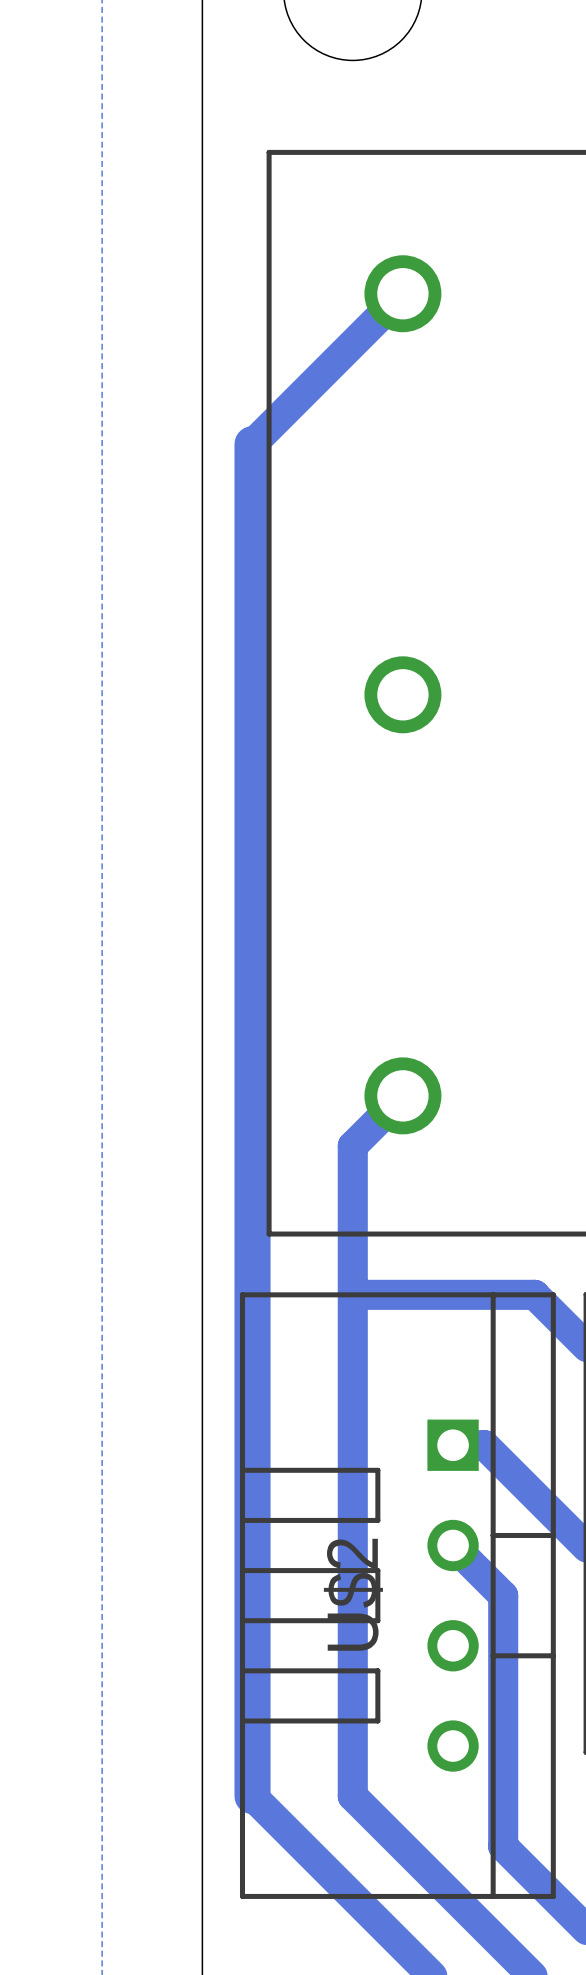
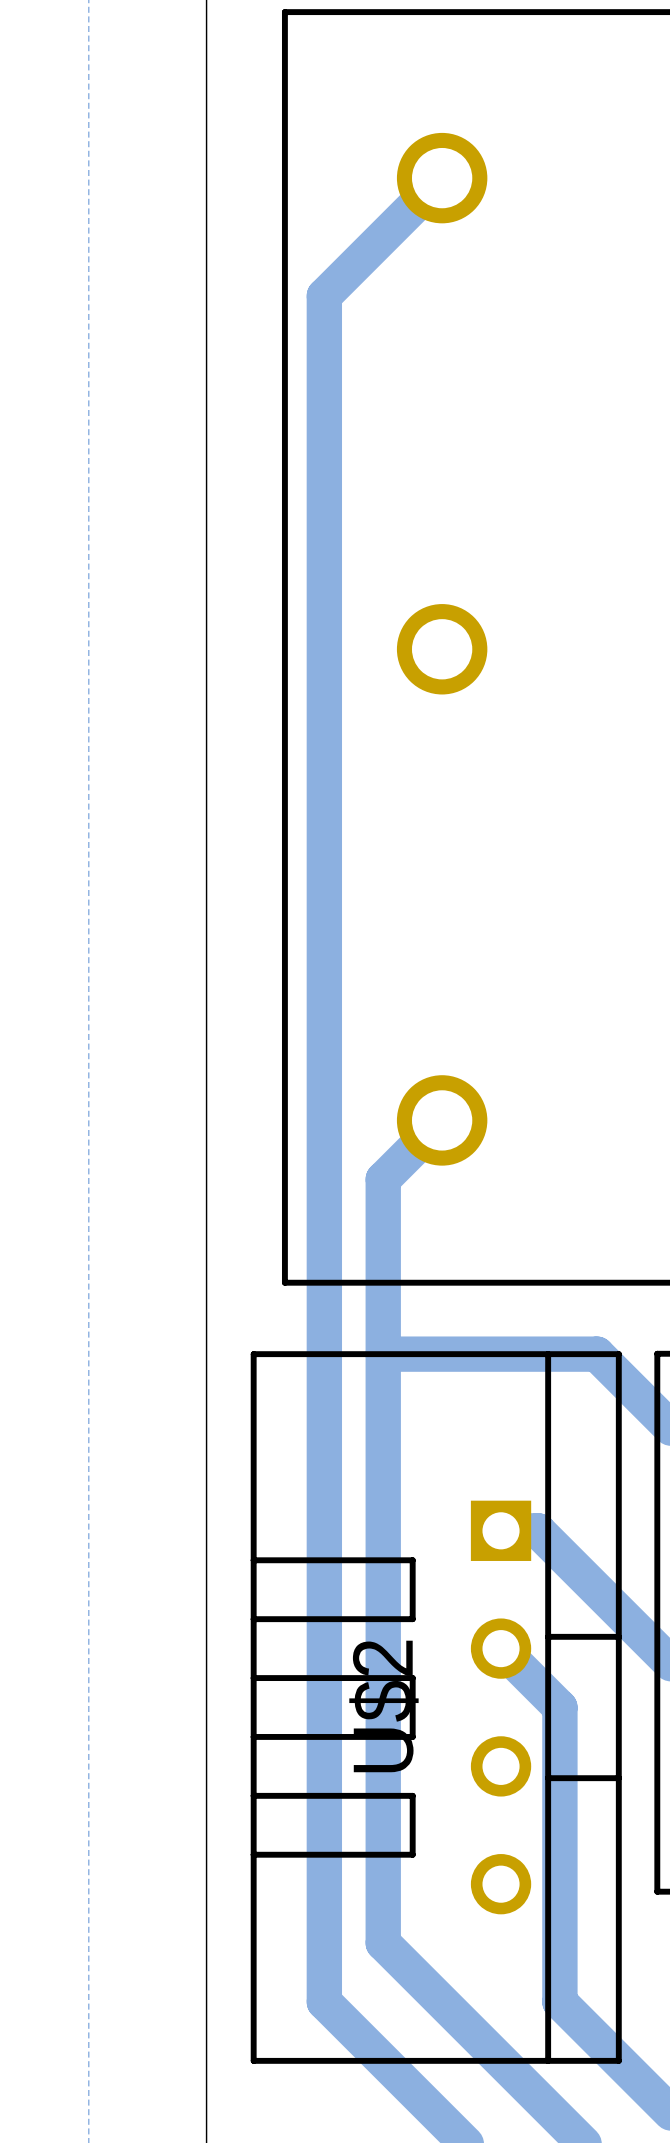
bottom track: (302, 394) (252, 444) (252, 1796) (302, 1846) -> (324, 295) (324, 2001)

